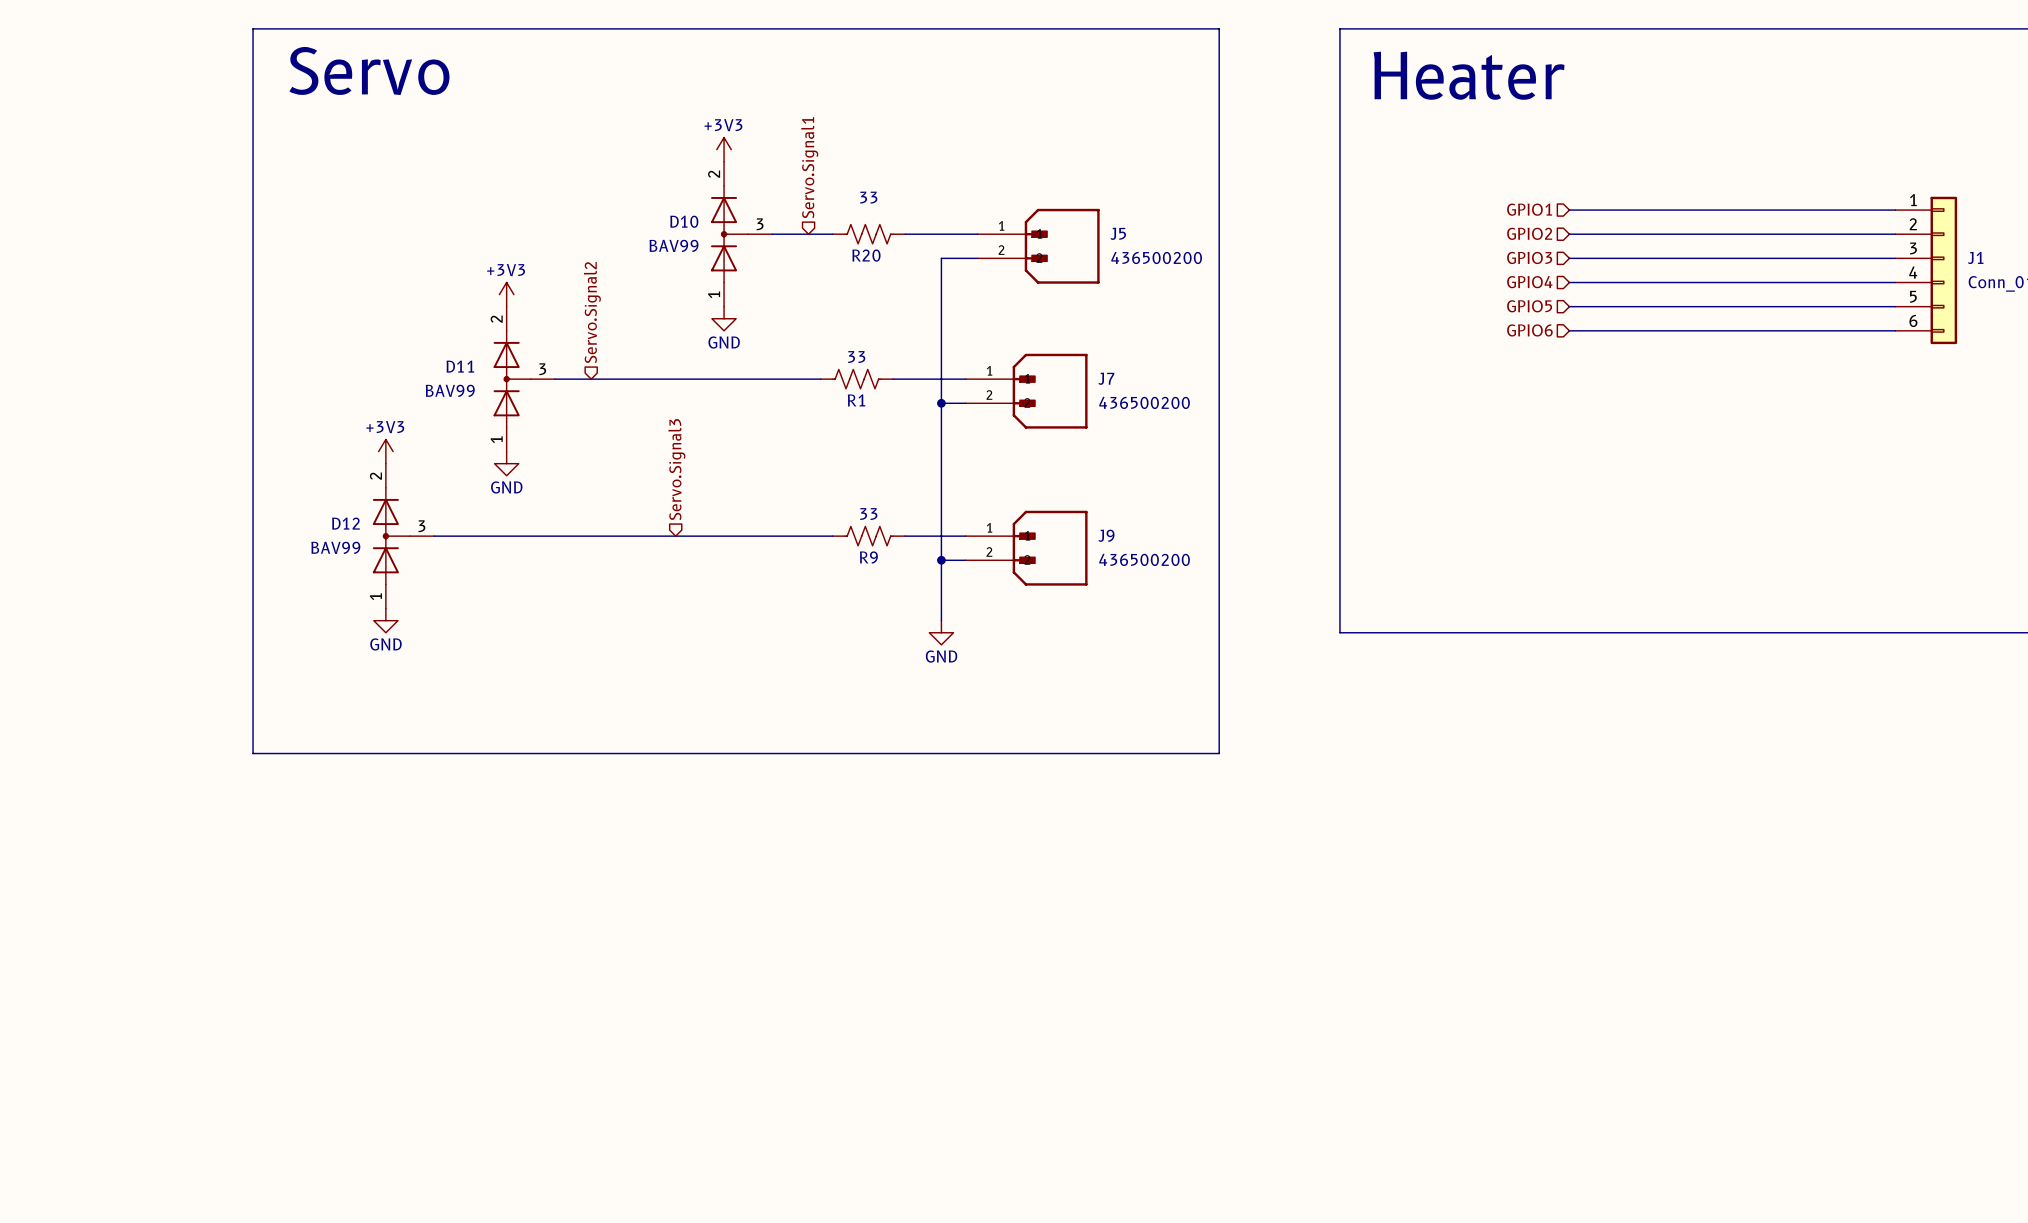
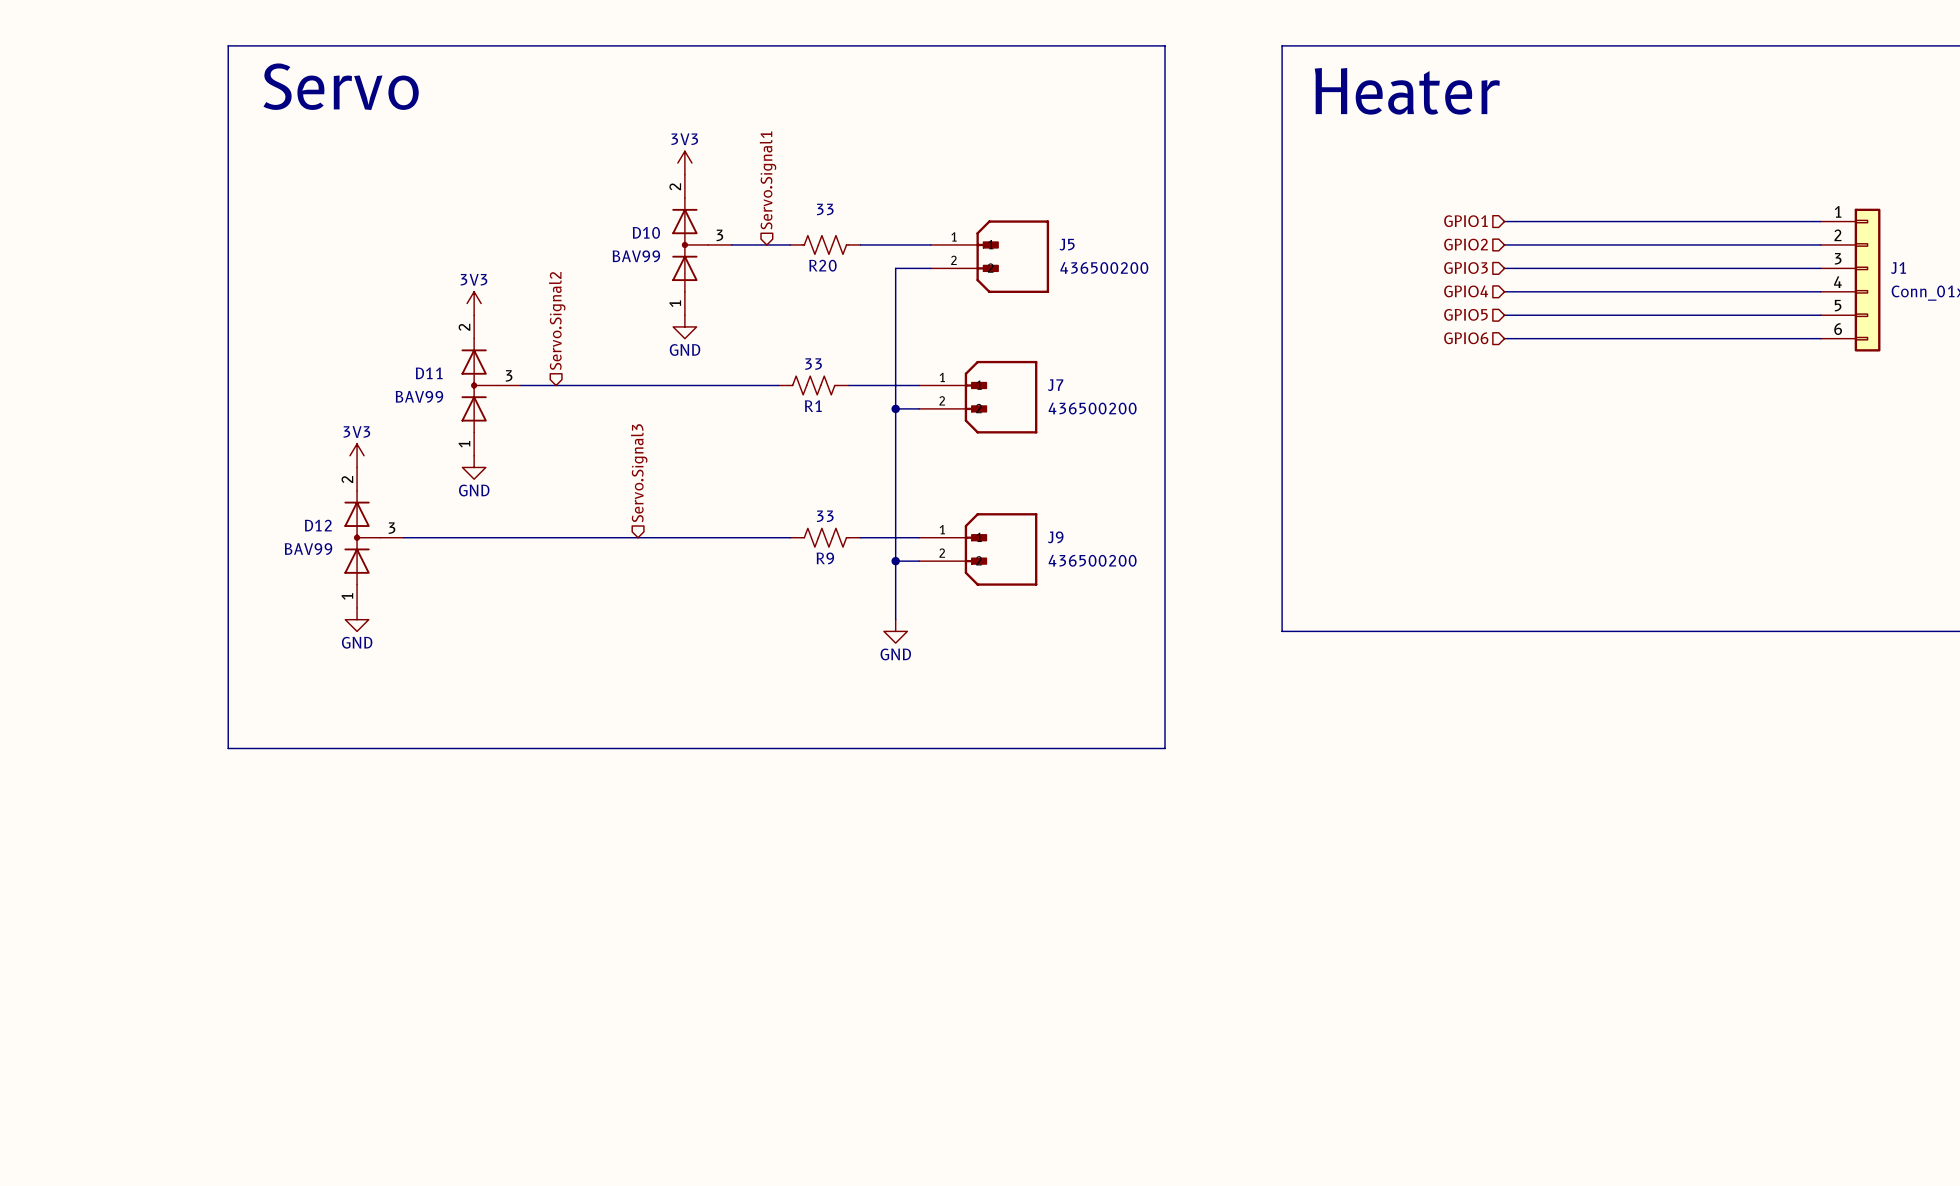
power symbol: +3V3 (724, 149) -> 3V3 (684, 163)
power symbol: +3V3 (506, 294) -> 3V3 (474, 303)
power symbol: +3V3 (385, 451) -> 3V3 (357, 455)

